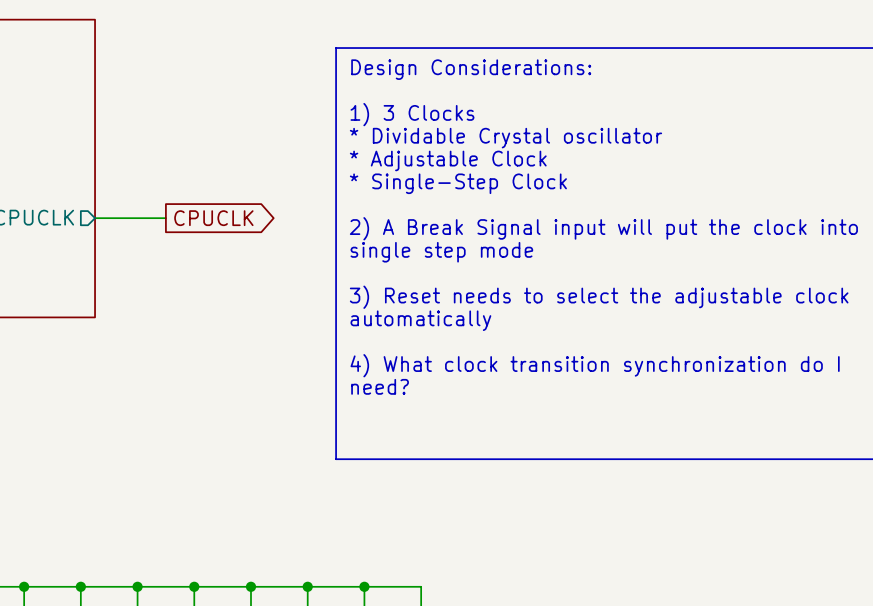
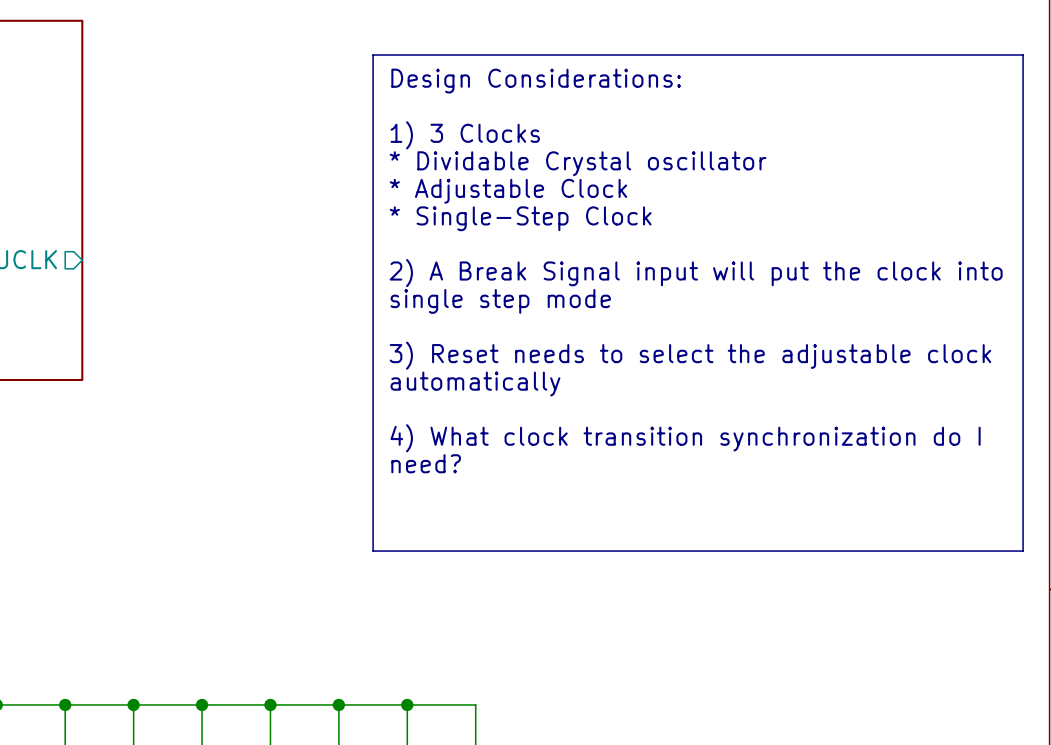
wire: (95, 218) (165, 218) -> none
global label: CPUCLK (213, 218) -> none

